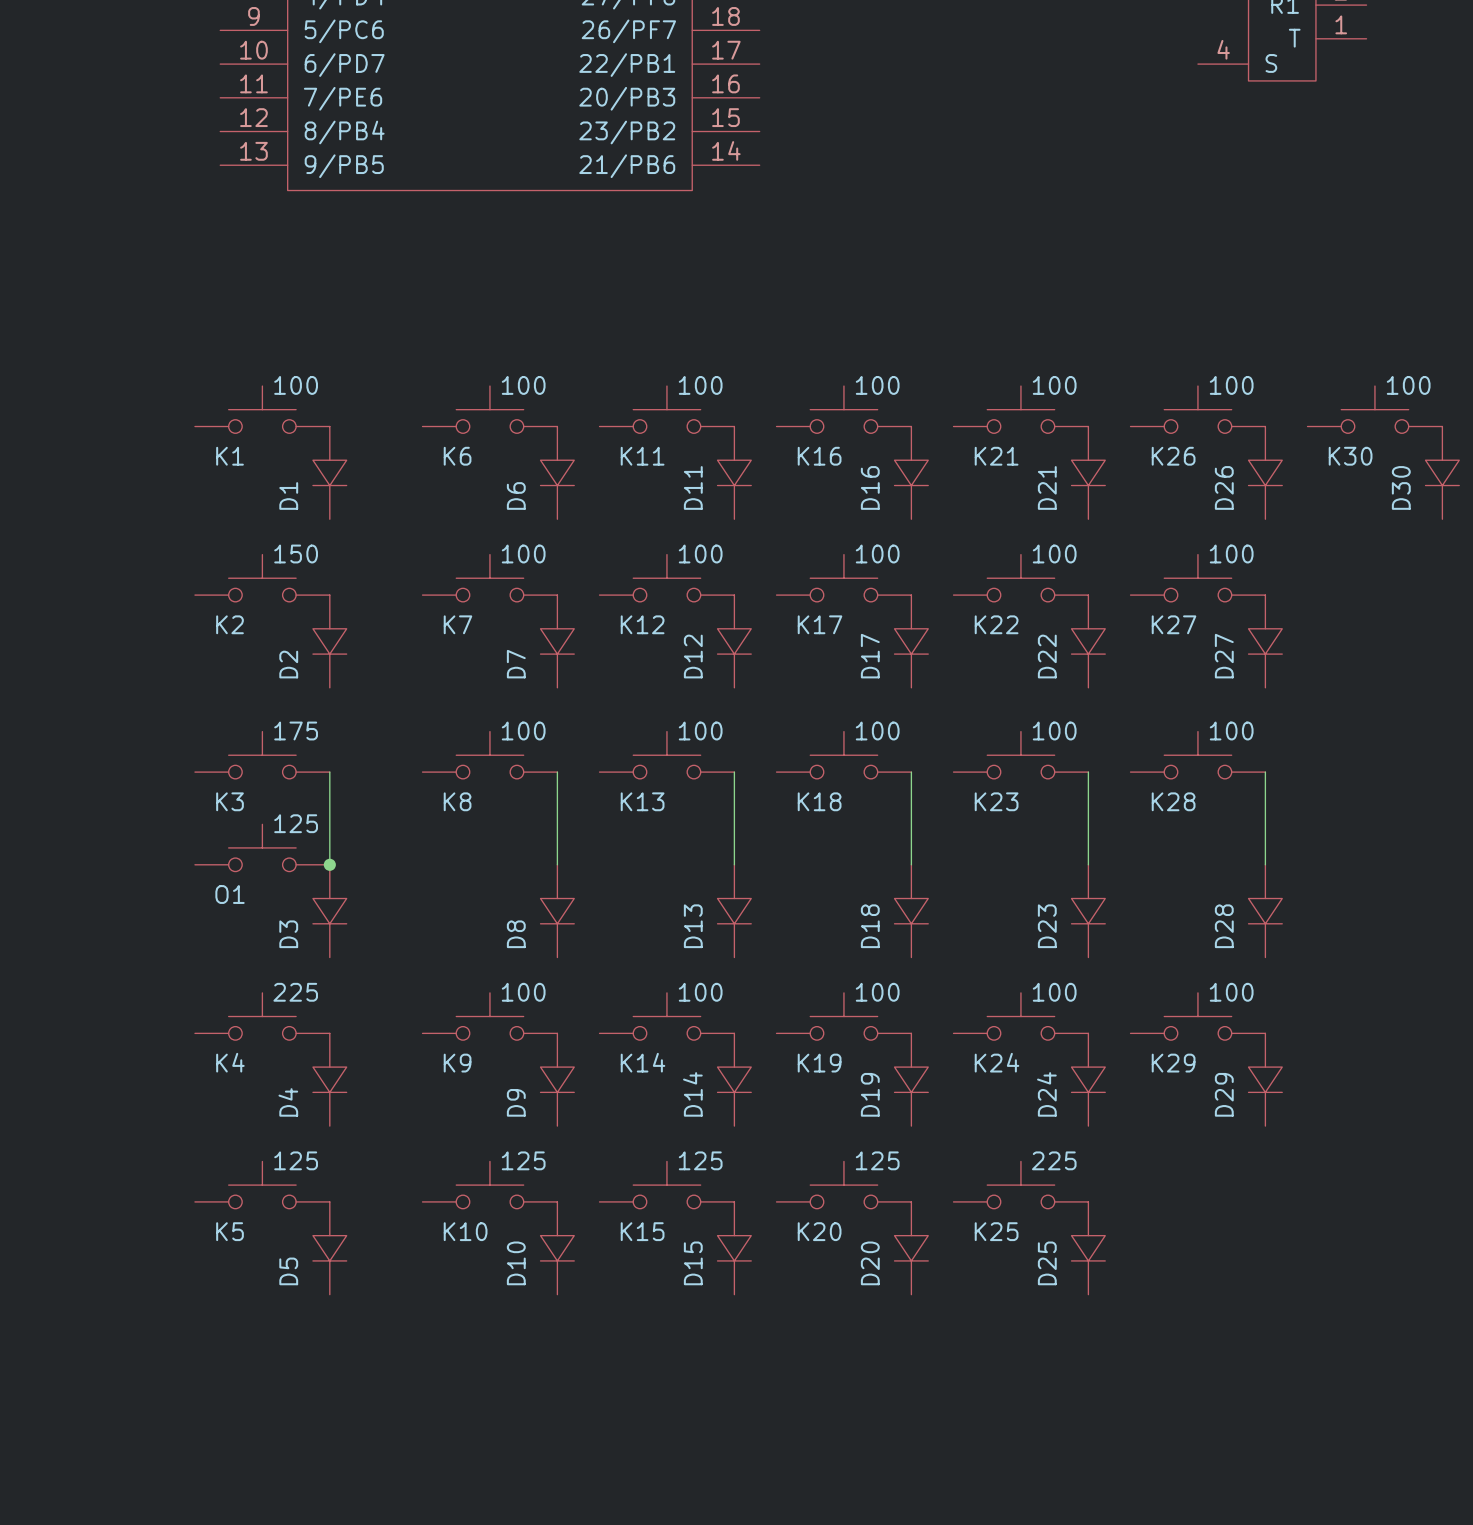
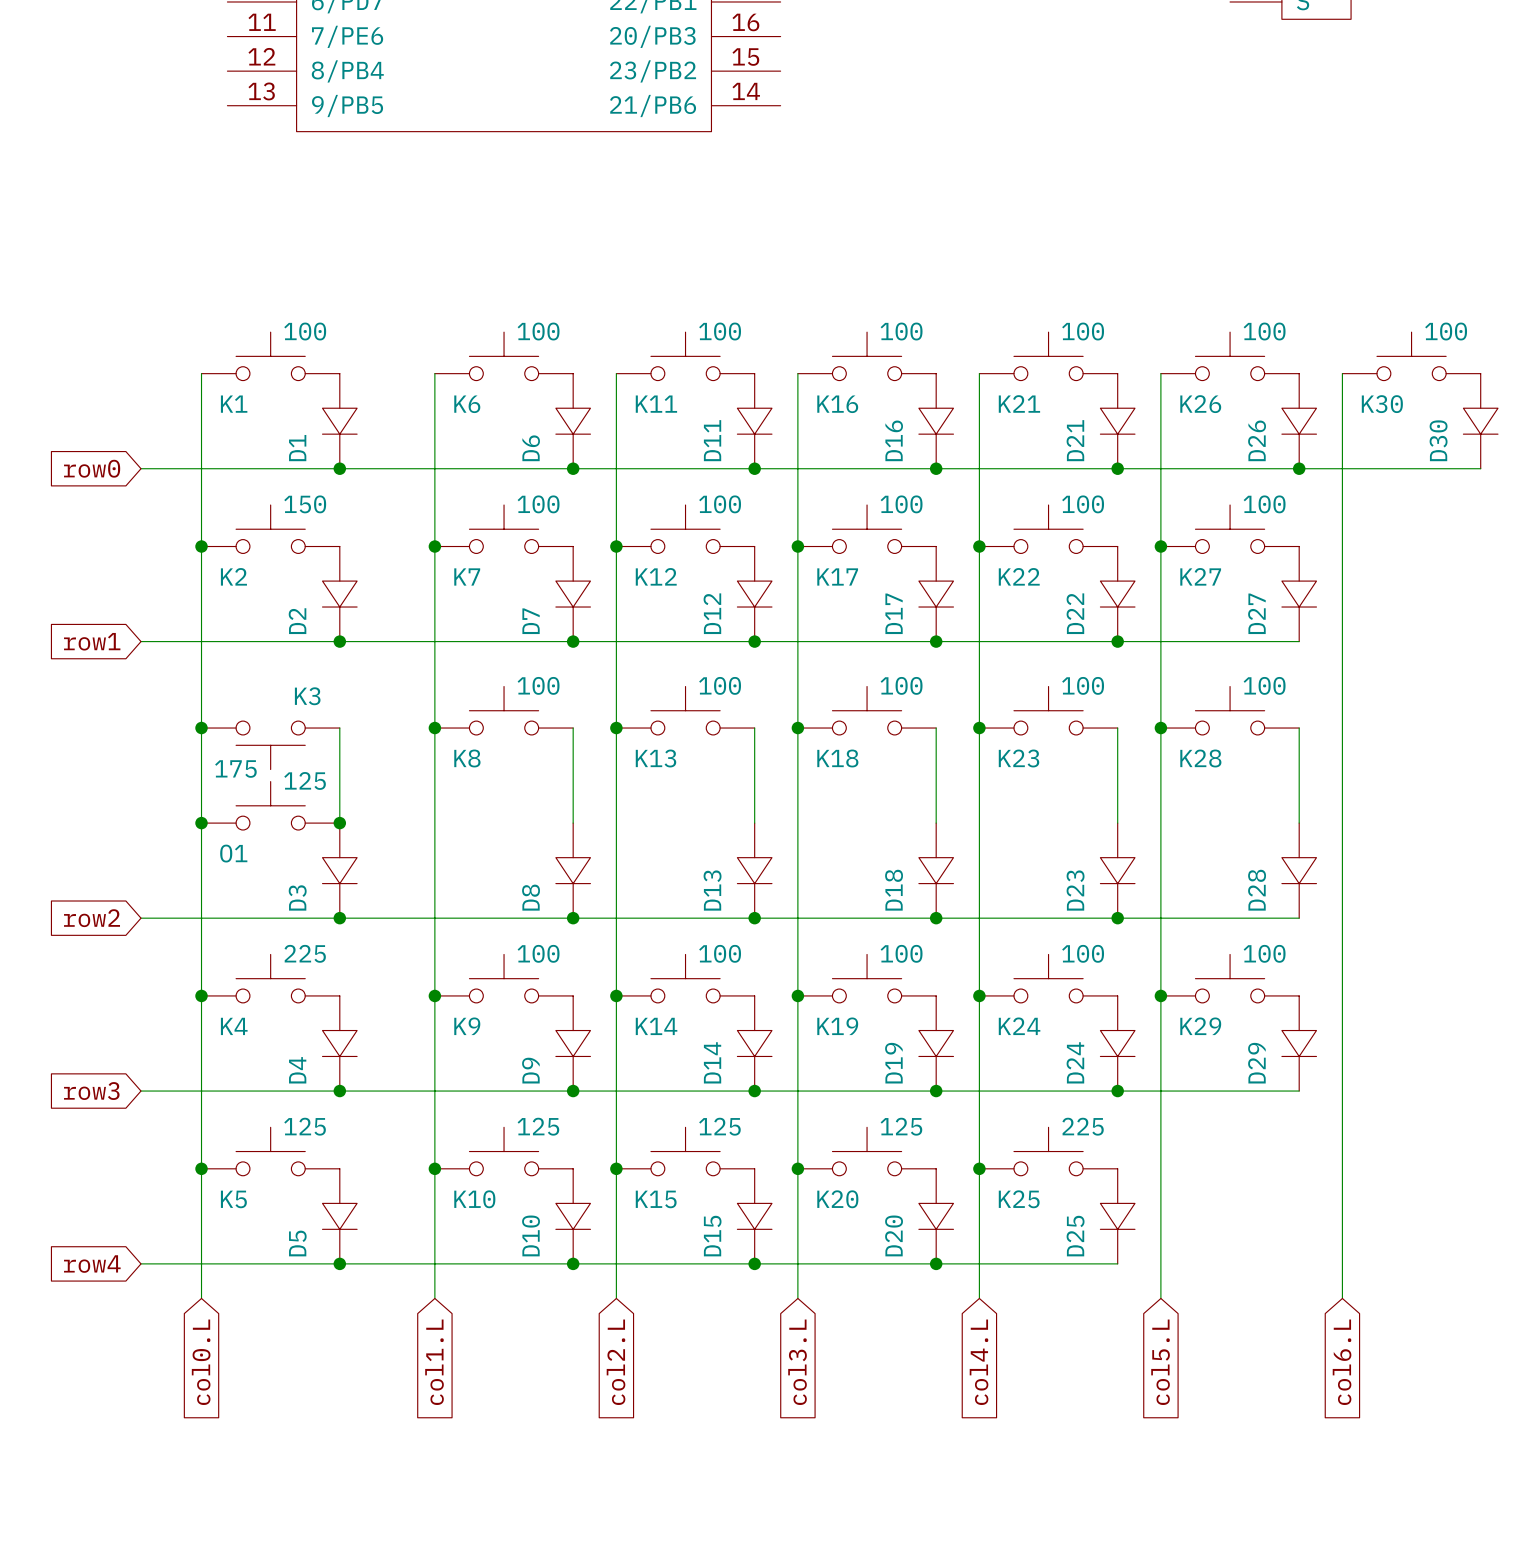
wire: none -> (201, 373) (201, 1298)
wire: none -> (434, 373) (434, 1298)
wire: none -> (616, 373) (616, 1298)
wire: none -> (797, 373) (797, 1298)
wire: none -> (979, 373) (979, 1298)
wire: none -> (1160, 373) (1160, 1298)
wire: none -> (1342, 373) (1342, 1298)
global label: none -> row0 (92, 468)
wire: none -> (141, 468) (1480, 468)
junction: none -> (339, 468)
junction: none -> (573, 468)
junction: none -> (754, 468)
junction: none -> (936, 468)
junction: none -> (1117, 468)
junction: none -> (1299, 468)
junction: none -> (201, 546)
junction: none -> (434, 546)
junction: none -> (616, 546)
junction: none -> (797, 546)
junction: none -> (979, 546)
junction: none -> (1160, 546)
global label: none -> row1 (92, 641)
wire: none -> (141, 641) (1299, 641)
junction: none -> (339, 641)
junction: none -> (573, 641)
junction: none -> (754, 641)
junction: none -> (936, 641)
junction: none -> (1117, 641)
K3 rotation: 0° (262, 755) -> 180° (270, 745)
junction: none -> (201, 728)
junction: none -> (434, 728)
junction: none -> (616, 728)
junction: none -> (797, 728)
junction: none -> (979, 728)
junction: none -> (1160, 728)
junction: none -> (201, 823)
global label: none -> row2 (92, 918)
wire: none -> (141, 918) (1299, 918)
junction: none -> (339, 918)
junction: none -> (573, 918)
junction: none -> (754, 918)
junction: none -> (936, 918)
junction: none -> (1117, 918)
junction: none -> (201, 995)
junction: none -> (434, 995)
junction: none -> (616, 995)
junction: none -> (797, 995)
junction: none -> (979, 995)
junction: none -> (1160, 995)
global label: none -> row3 (91, 1091)
wire: none -> (141, 1091) (1299, 1091)
junction: none -> (339, 1091)
junction: none -> (573, 1091)
junction: none -> (754, 1091)
junction: none -> (936, 1091)
junction: none -> (1117, 1091)
junction: none -> (201, 1168)
junction: none -> (434, 1168)
junction: none -> (616, 1168)
junction: none -> (797, 1168)
junction: none -> (979, 1168)
global label: none -> row4 (92, 1264)
wire: none -> (141, 1263) (1117, 1263)
junction: none -> (339, 1263)
junction: none -> (573, 1263)
junction: none -> (754, 1263)
junction: none -> (936, 1263)
global label: none -> col0.L (201, 1362)
global label: none -> col1.L (434, 1362)
global label: none -> col2.L (616, 1362)
global label: none -> col3.L (797, 1362)
global label: none -> col4.L (979, 1362)
global label: none -> col5.L (1160, 1362)
global label: none -> col6.L (1342, 1362)

